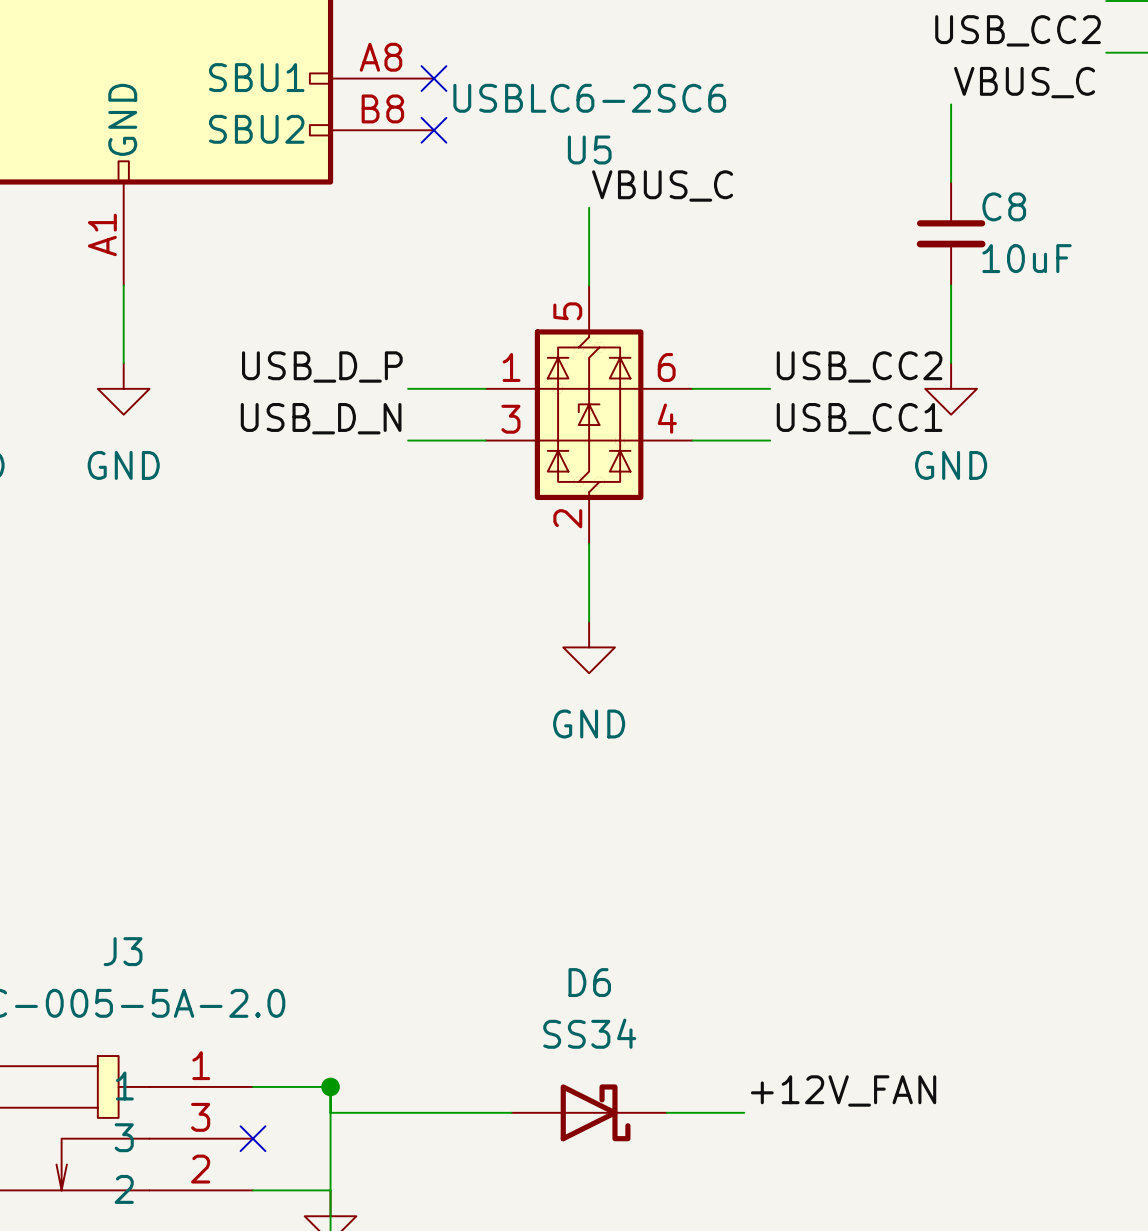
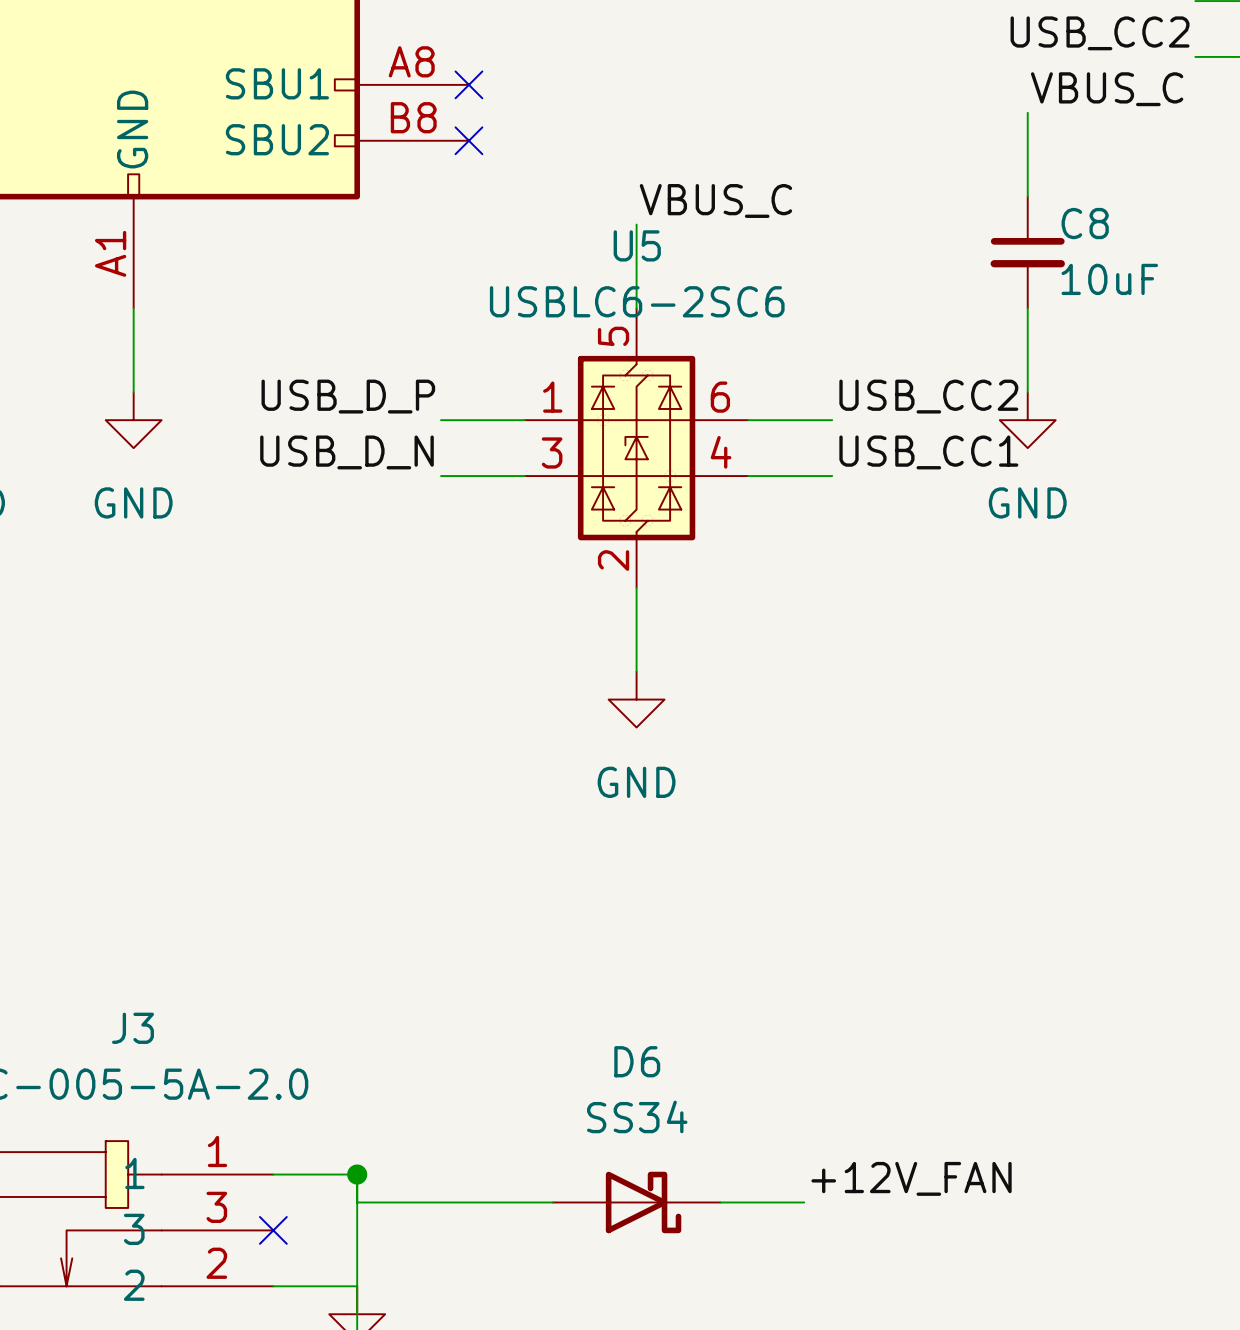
U5 value position: USBLC6-2SC6 (589, 98) -> USBLC6-2SC6 (637, 301)
U5 name position: U5 (589, 149) -> U5 (637, 245)

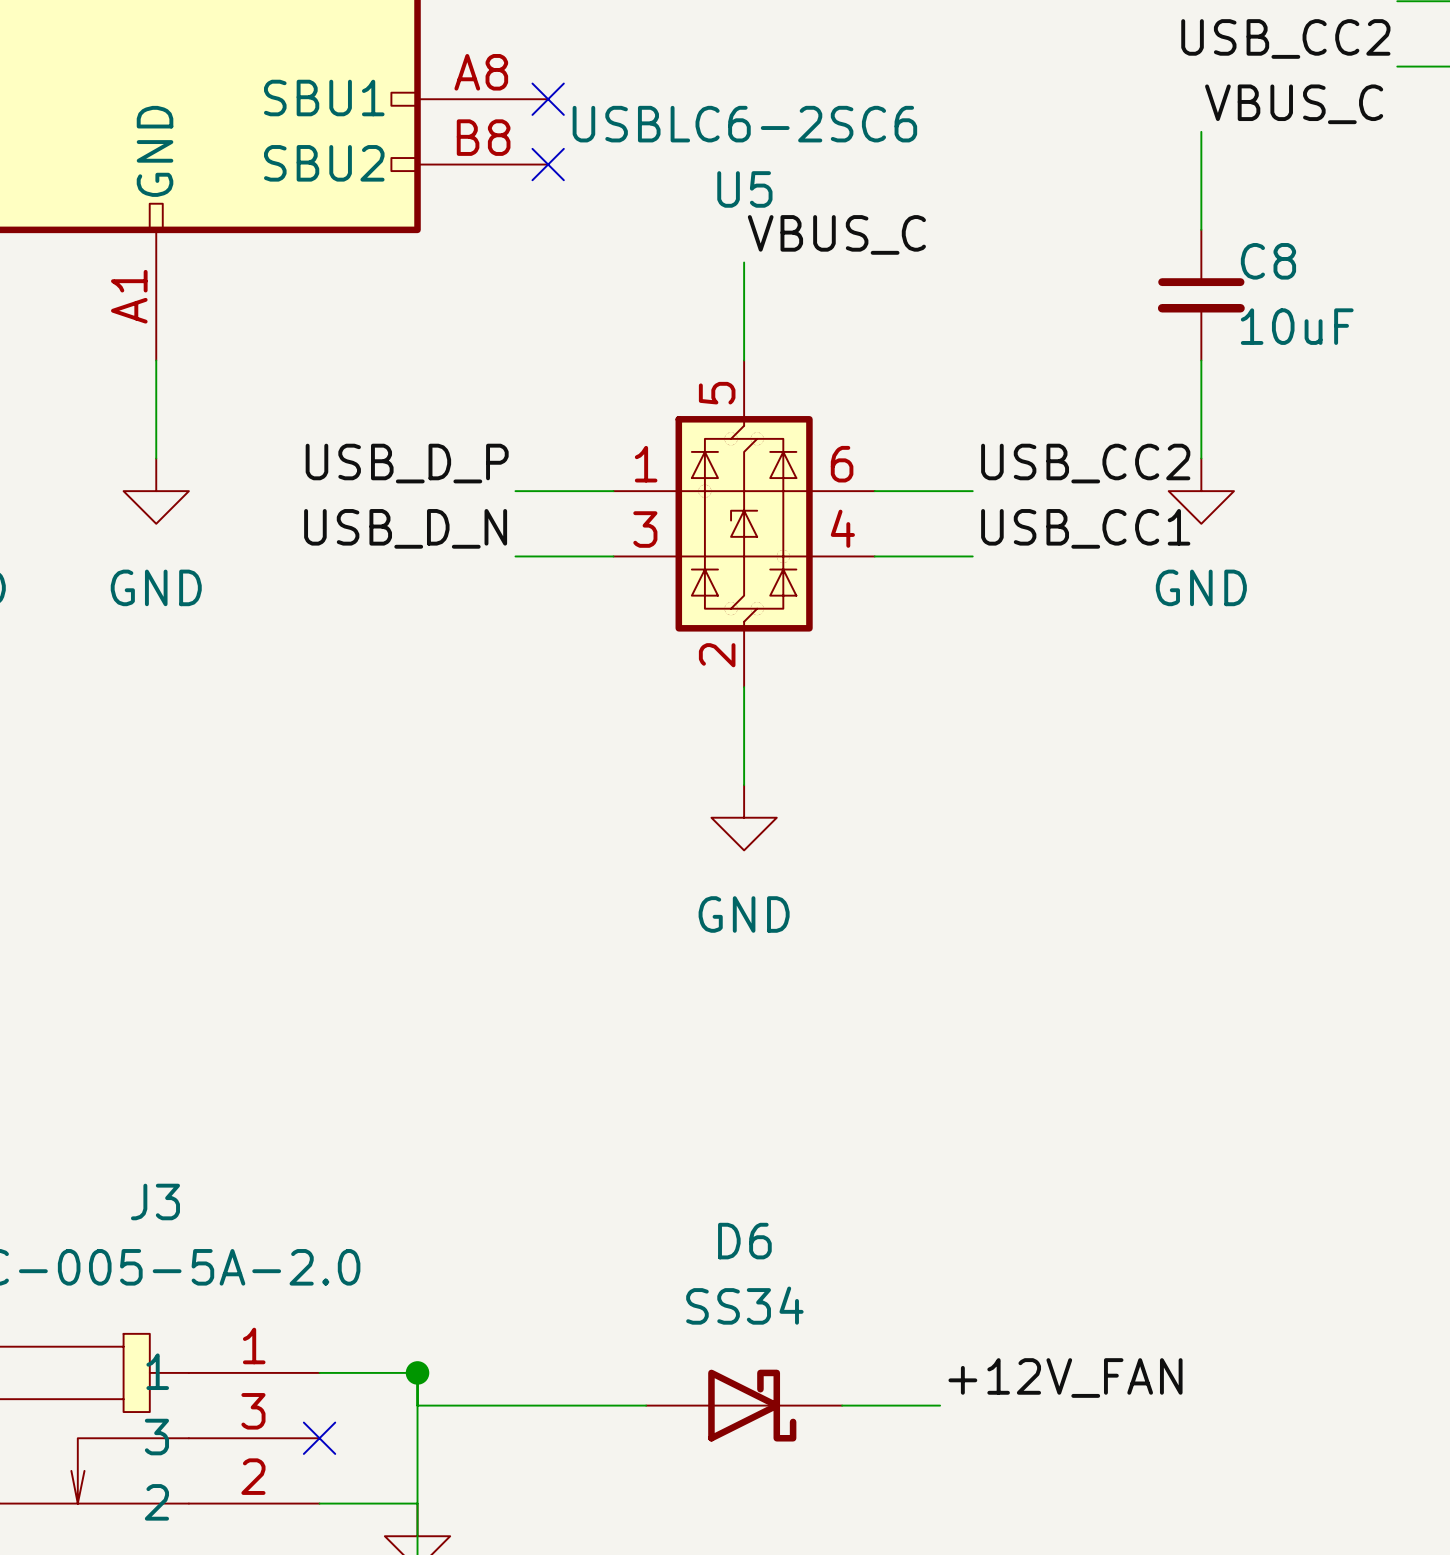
U5 name position: U5 (637, 245) -> U5 (744, 189)
U5 value position: USBLC6-2SC6 (637, 301) -> USBLC6-2SC6 (744, 124)

